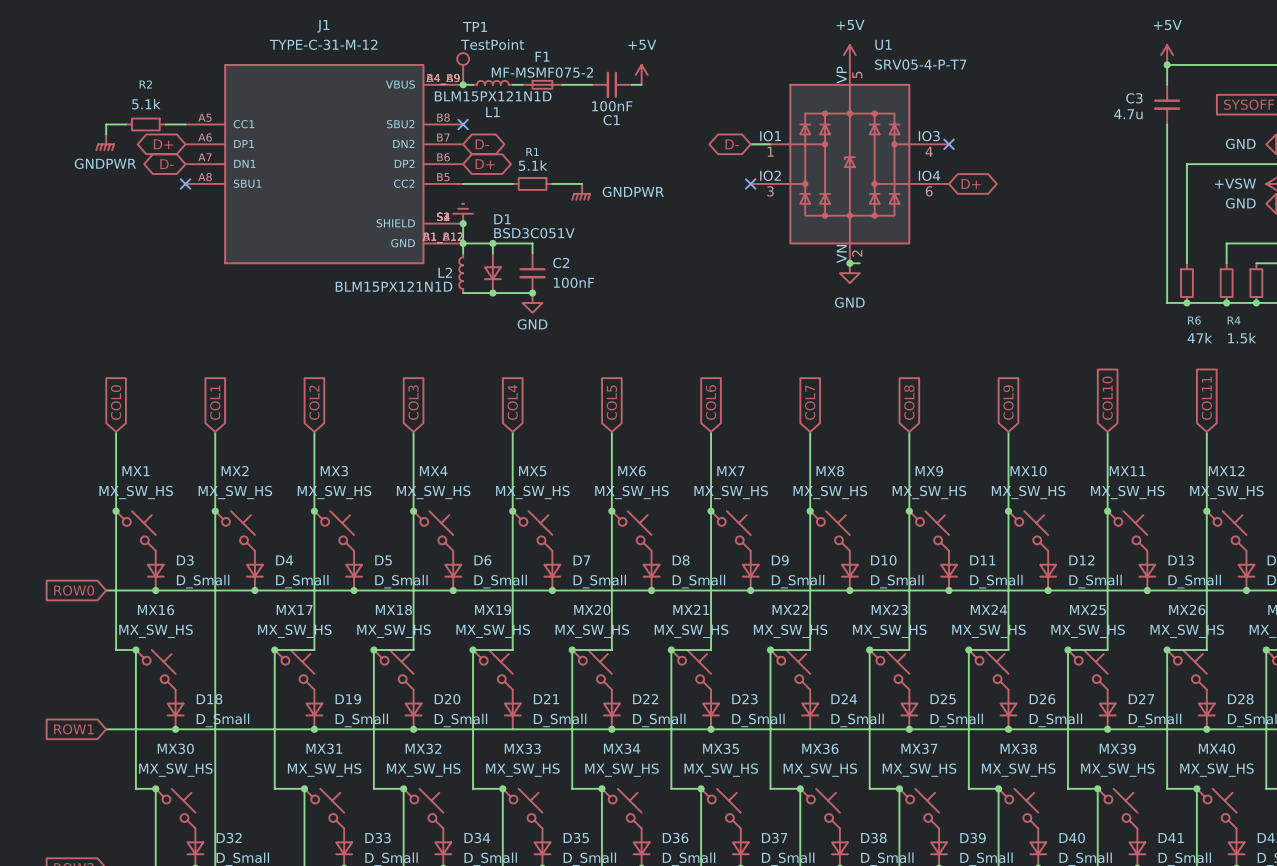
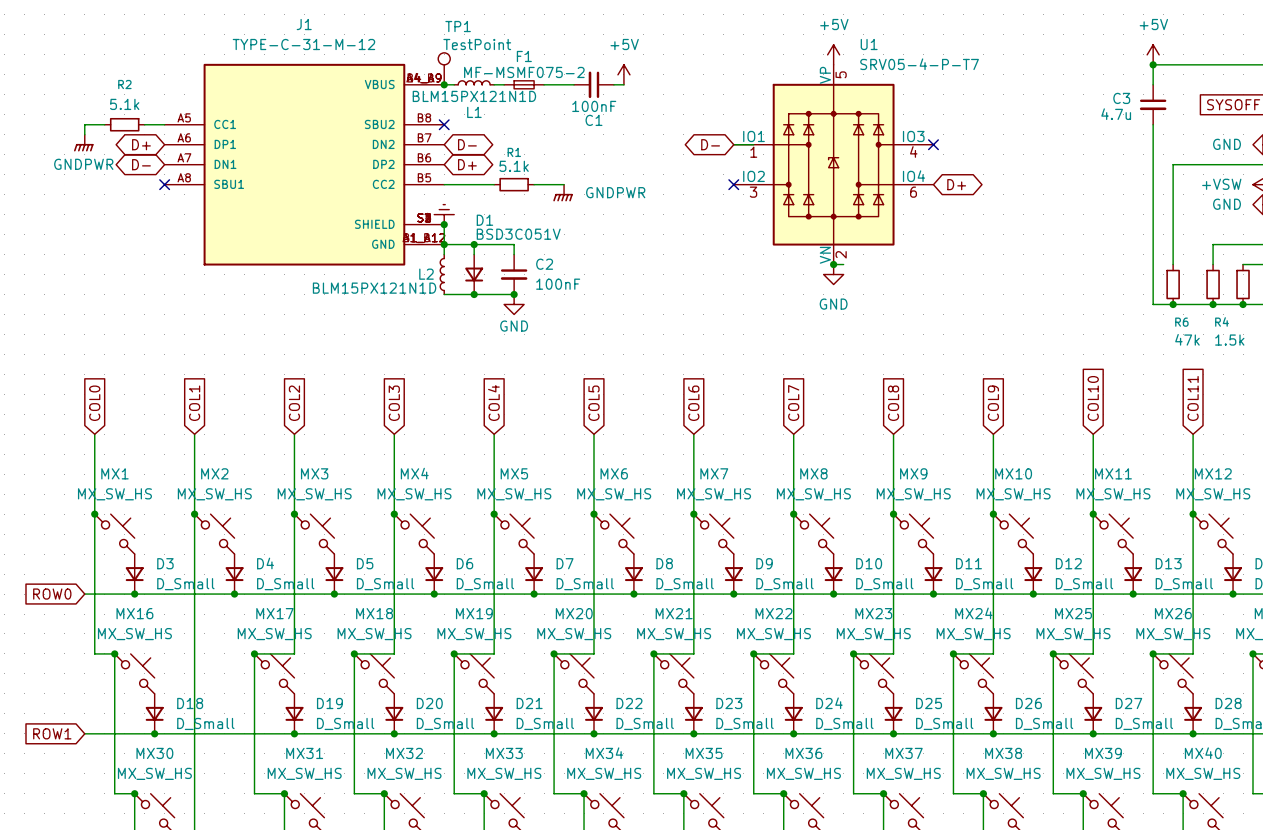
junction: none -> (494, 733)
junction: none -> (793, 733)

